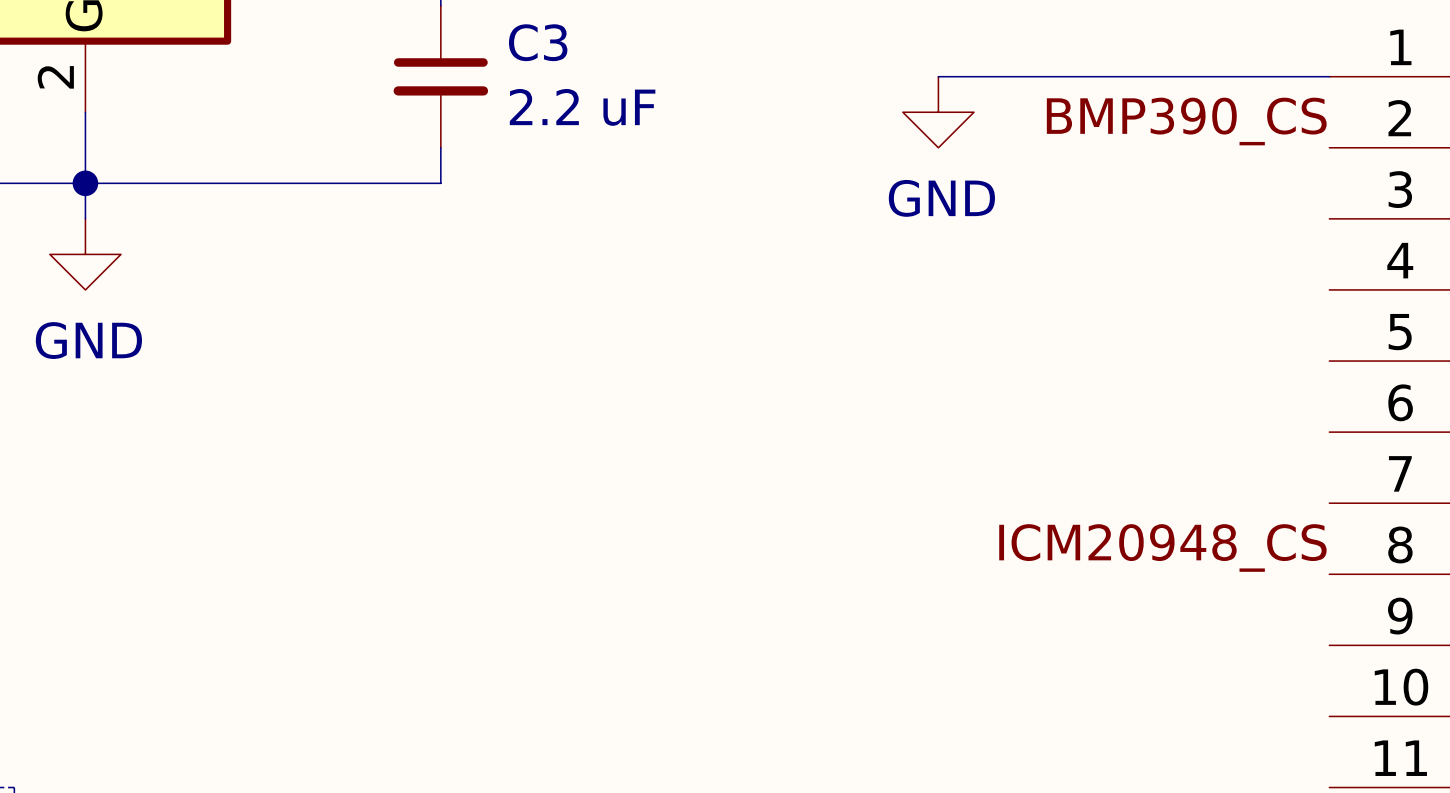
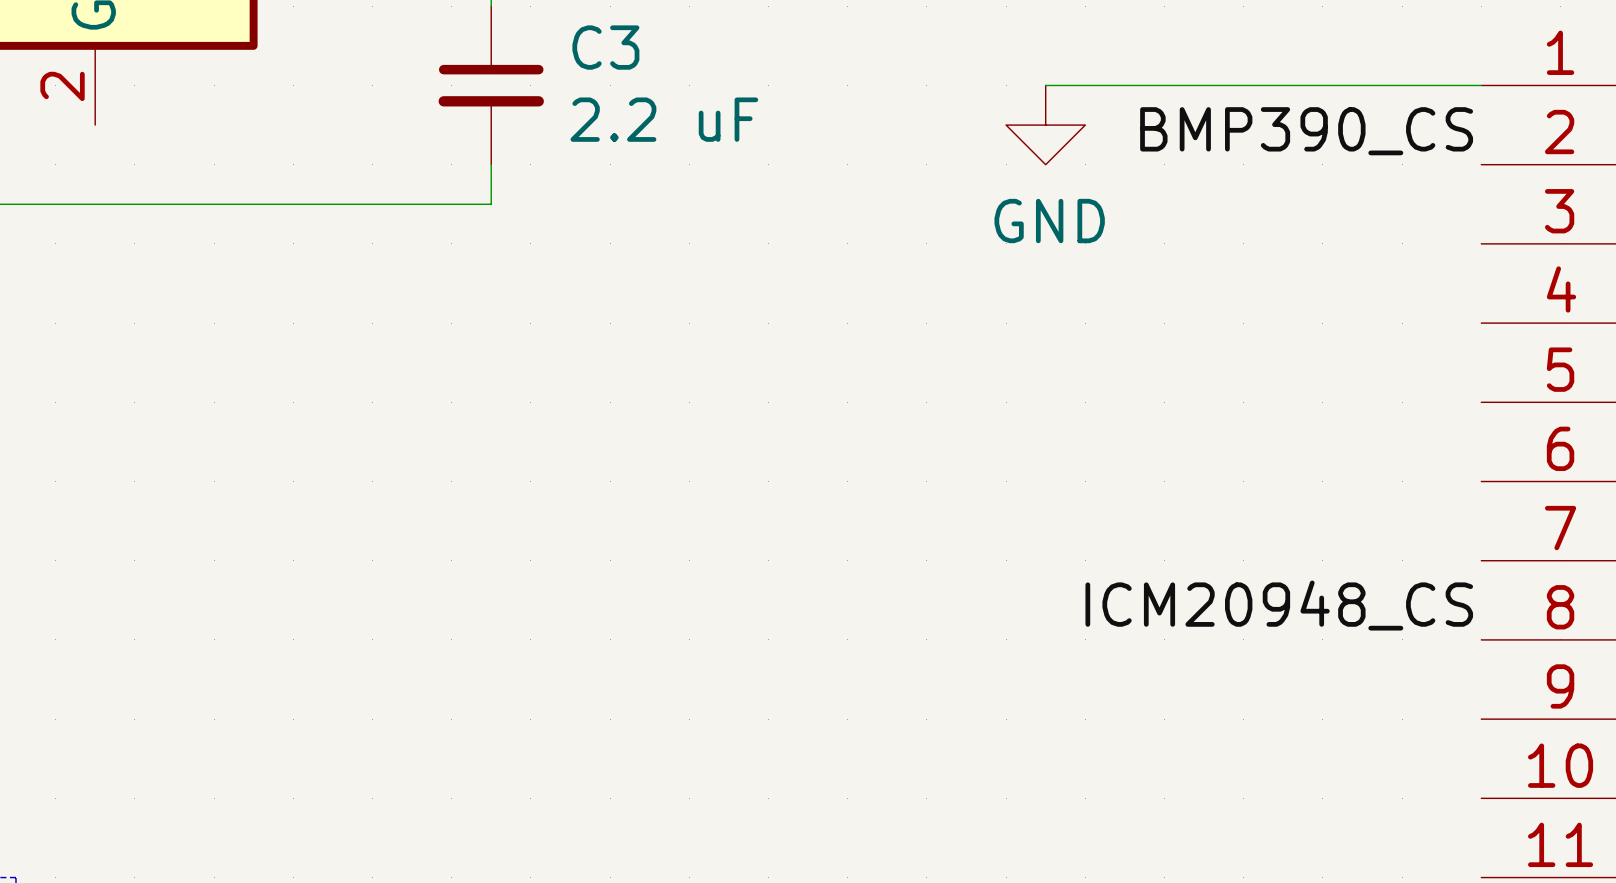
wire: (85, 112) (85, 218) -> none
junction: (85, 183) -> none
power symbol: GND (85, 254) -> none

